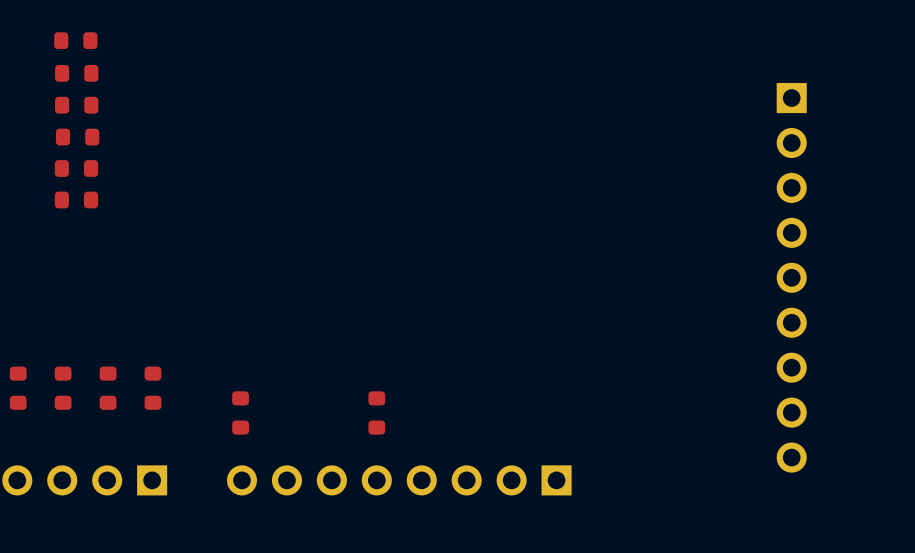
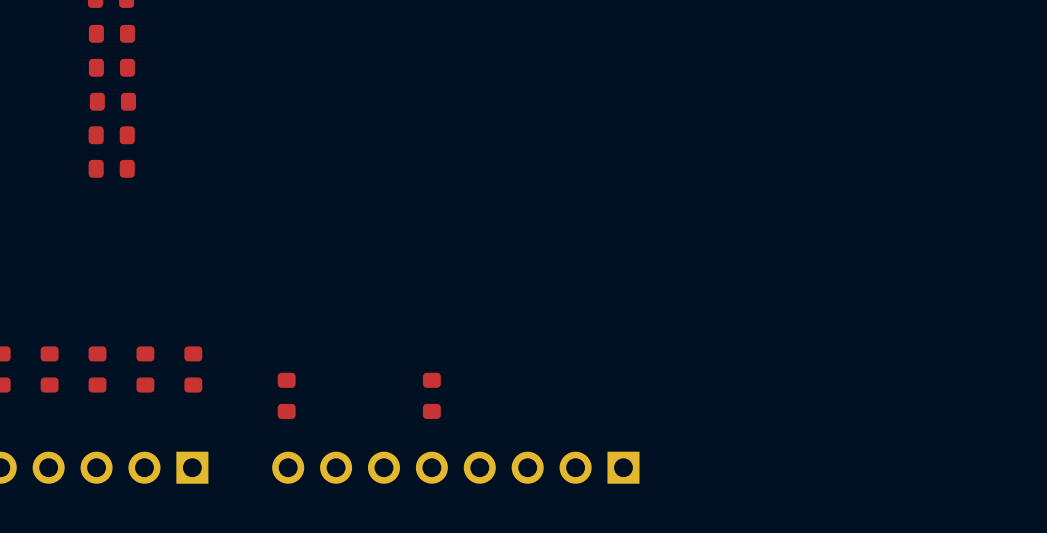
part: (791, 277) -> none

